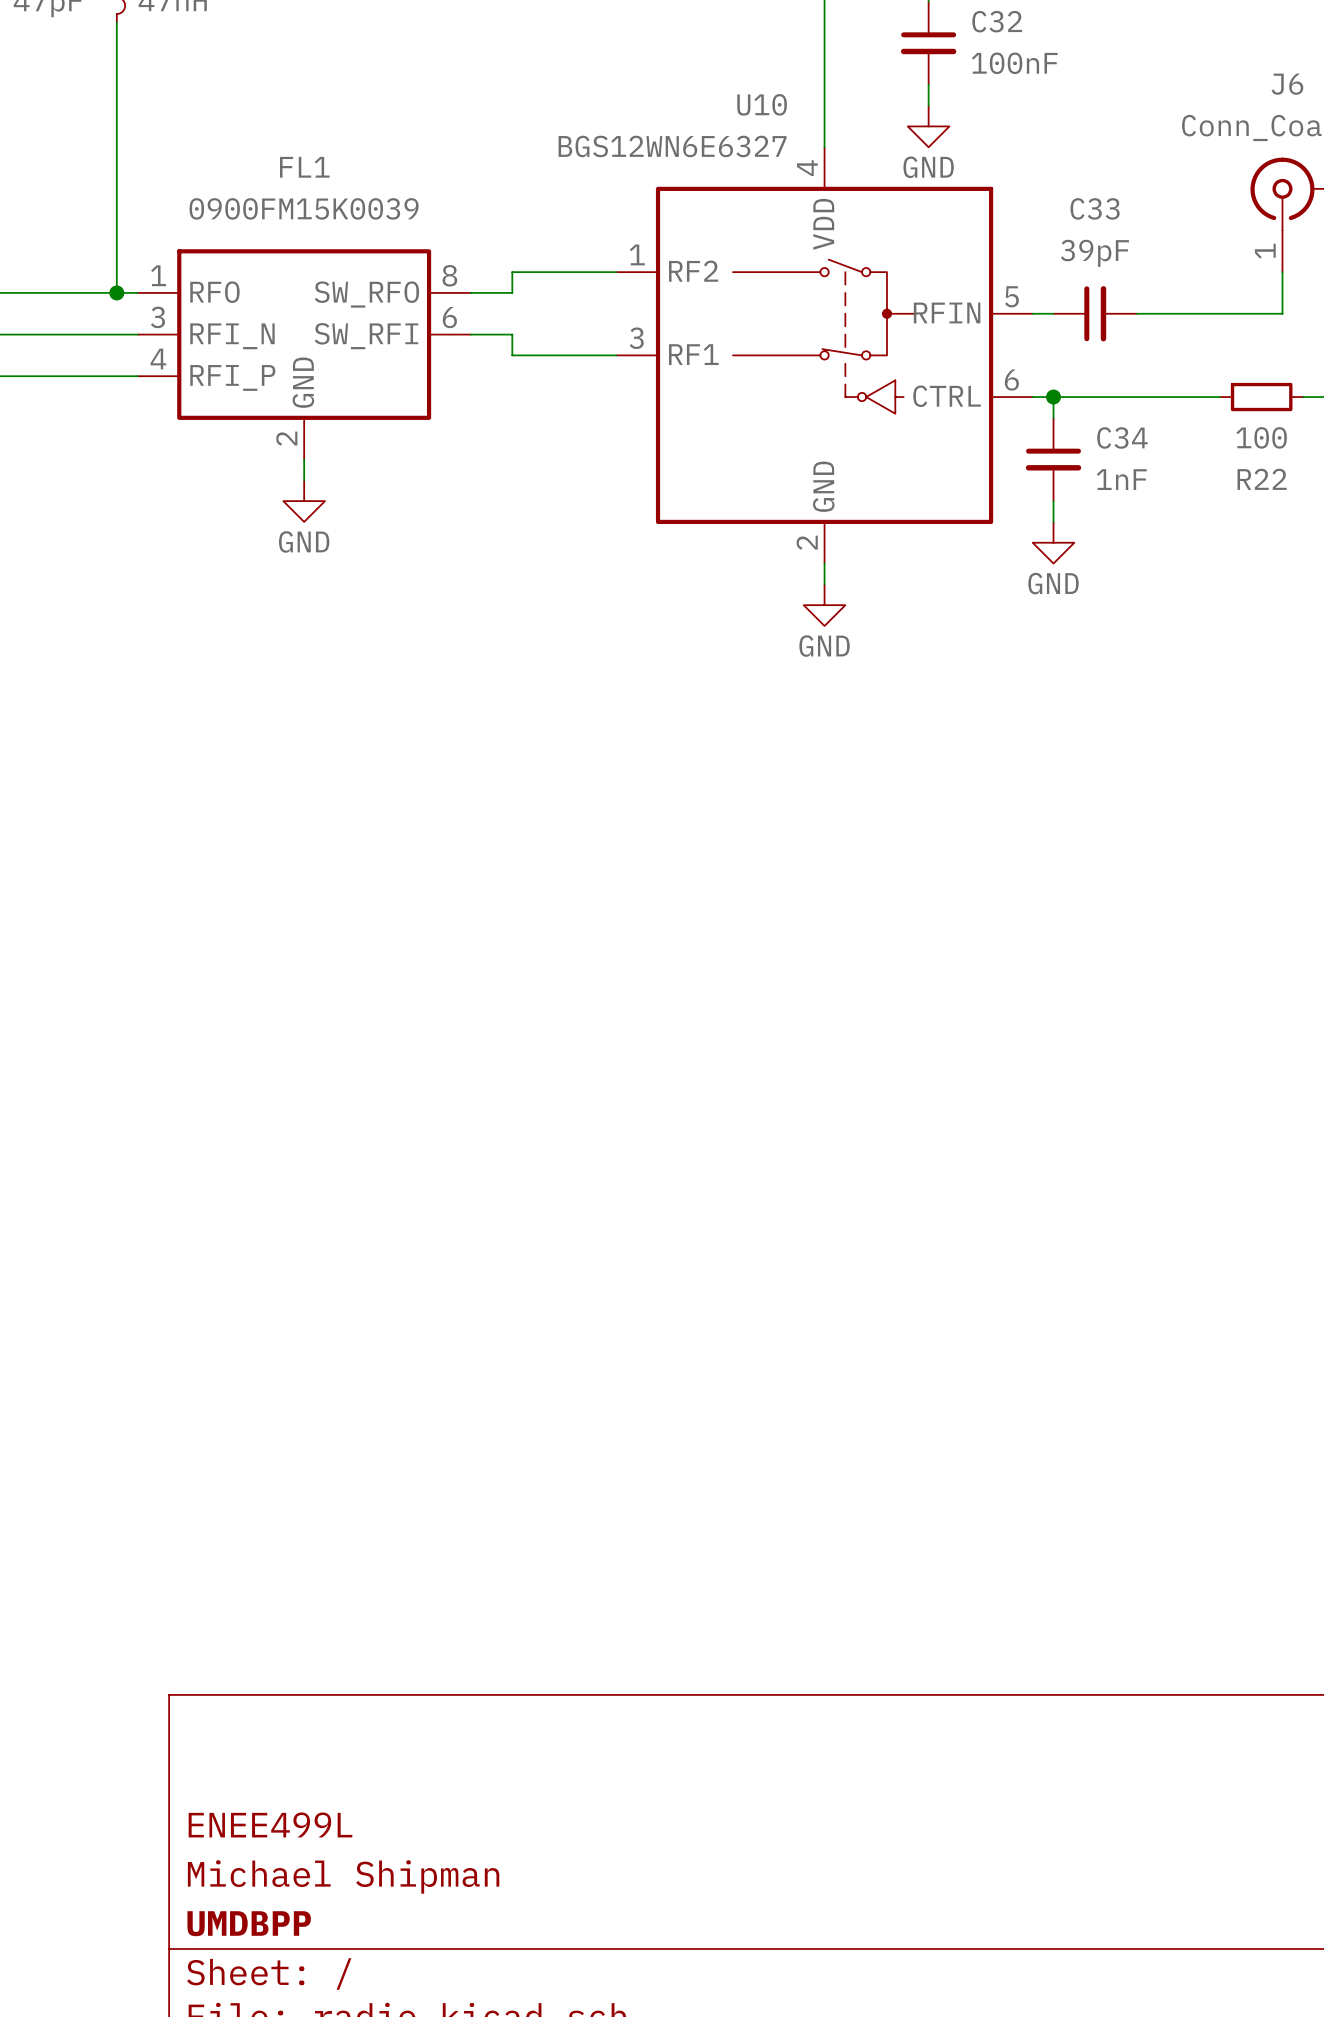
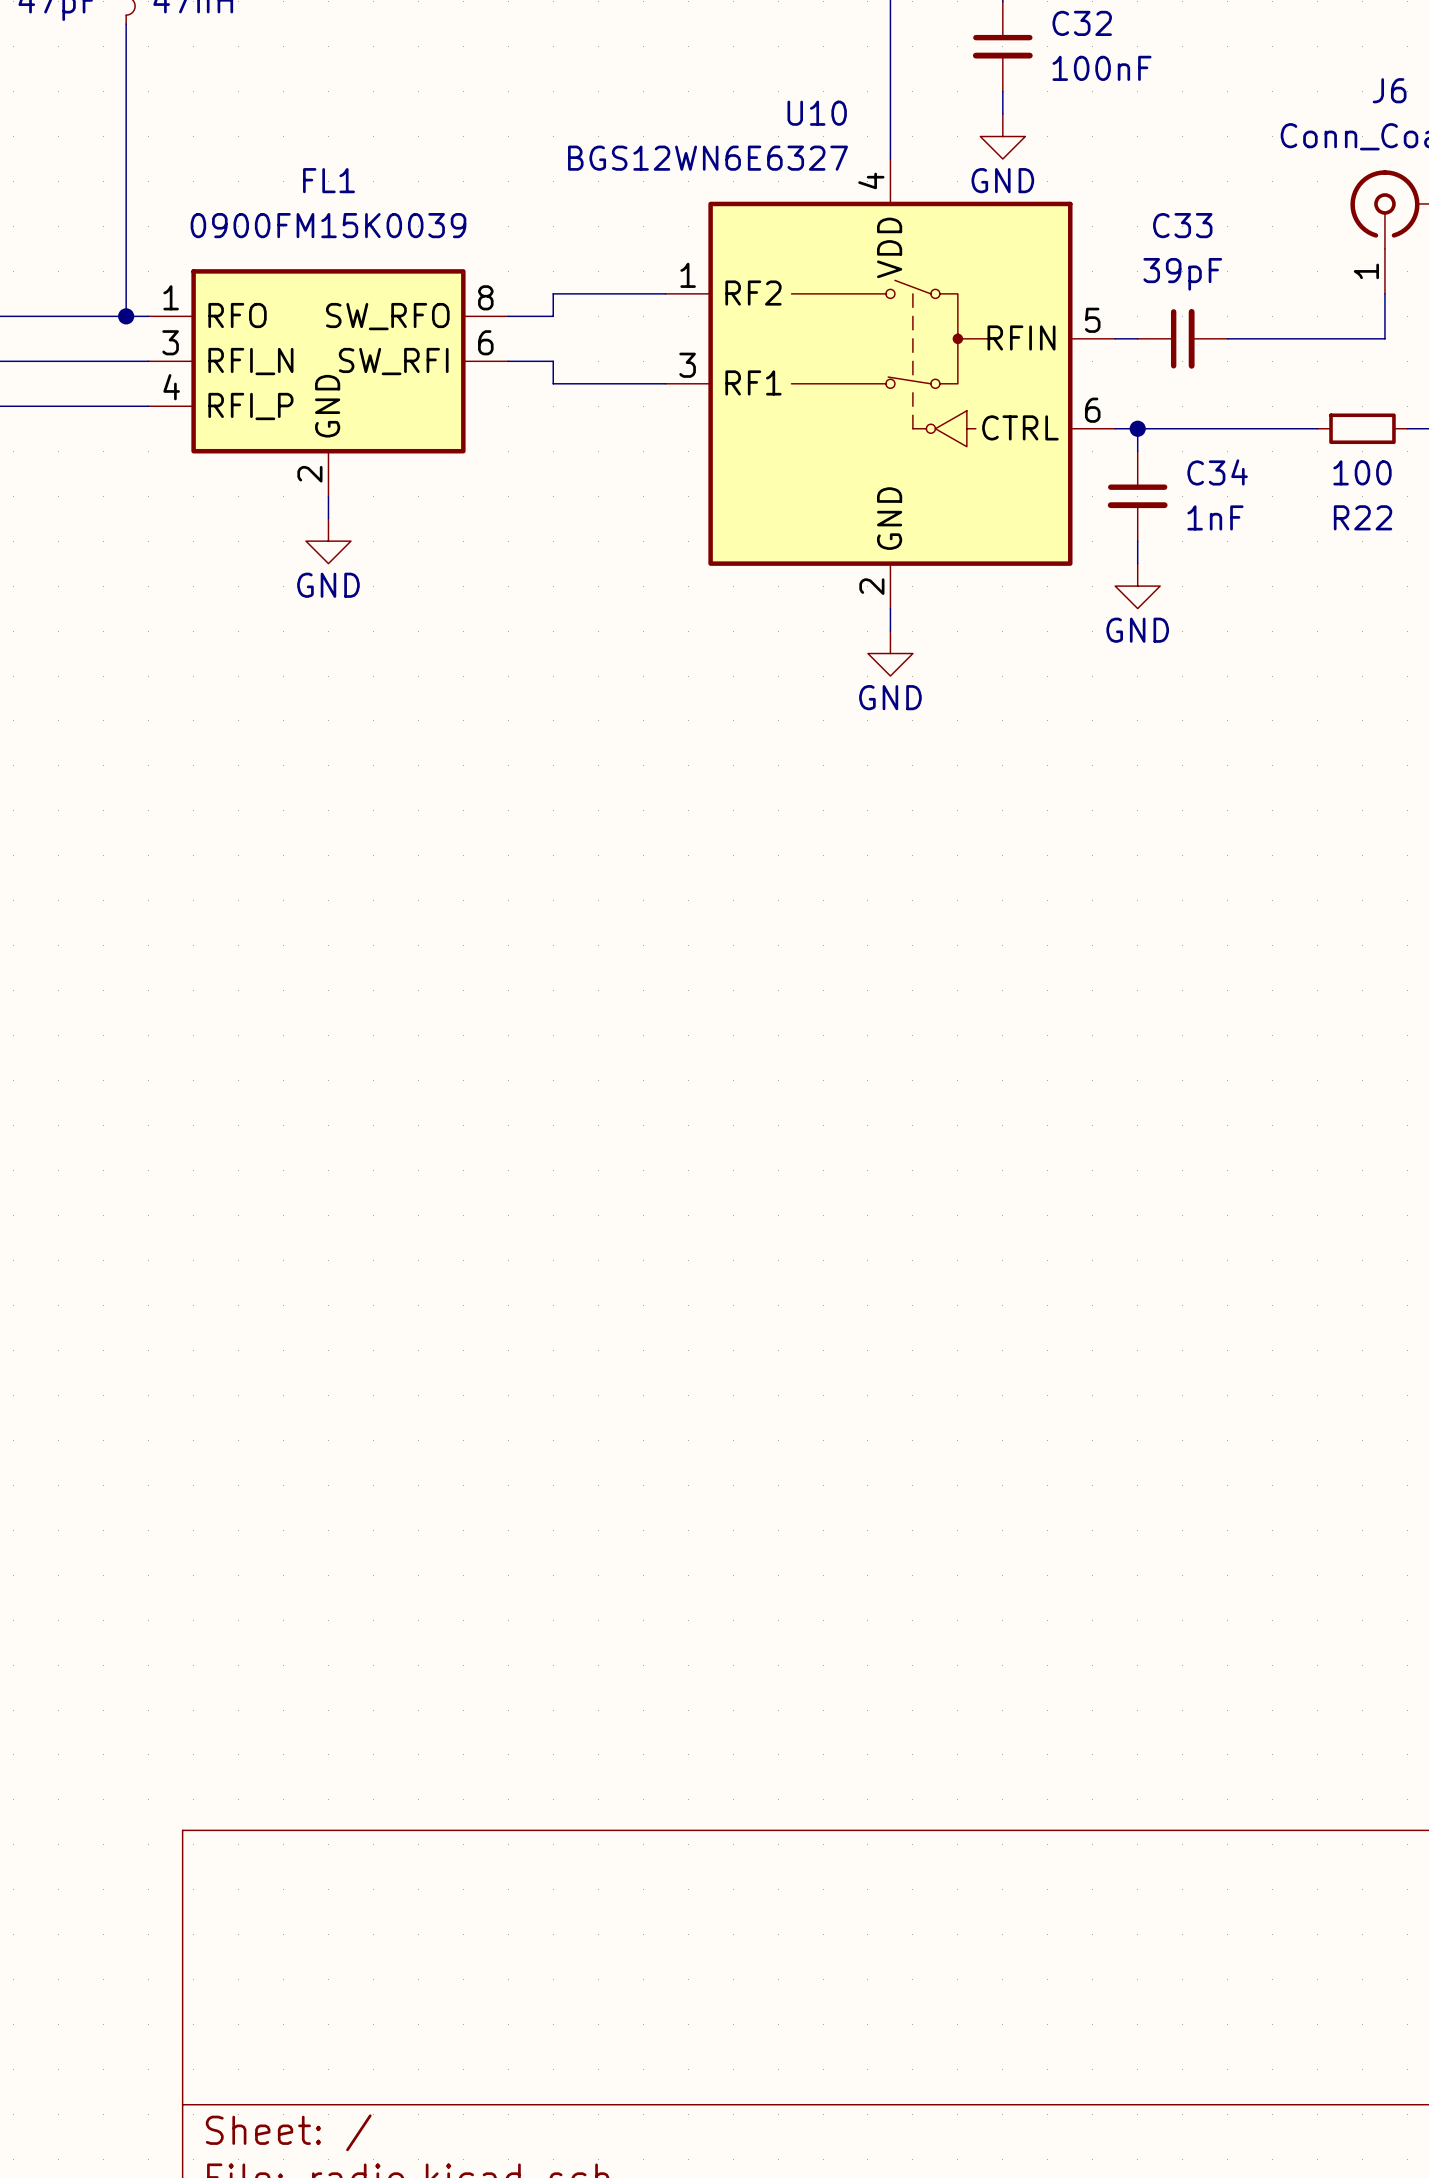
title block: ENEE499L (270, 1824) -> none
title block: Michael Shipman (343, 1876) -> none
title block: UMDBPP (249, 1923) -> none

